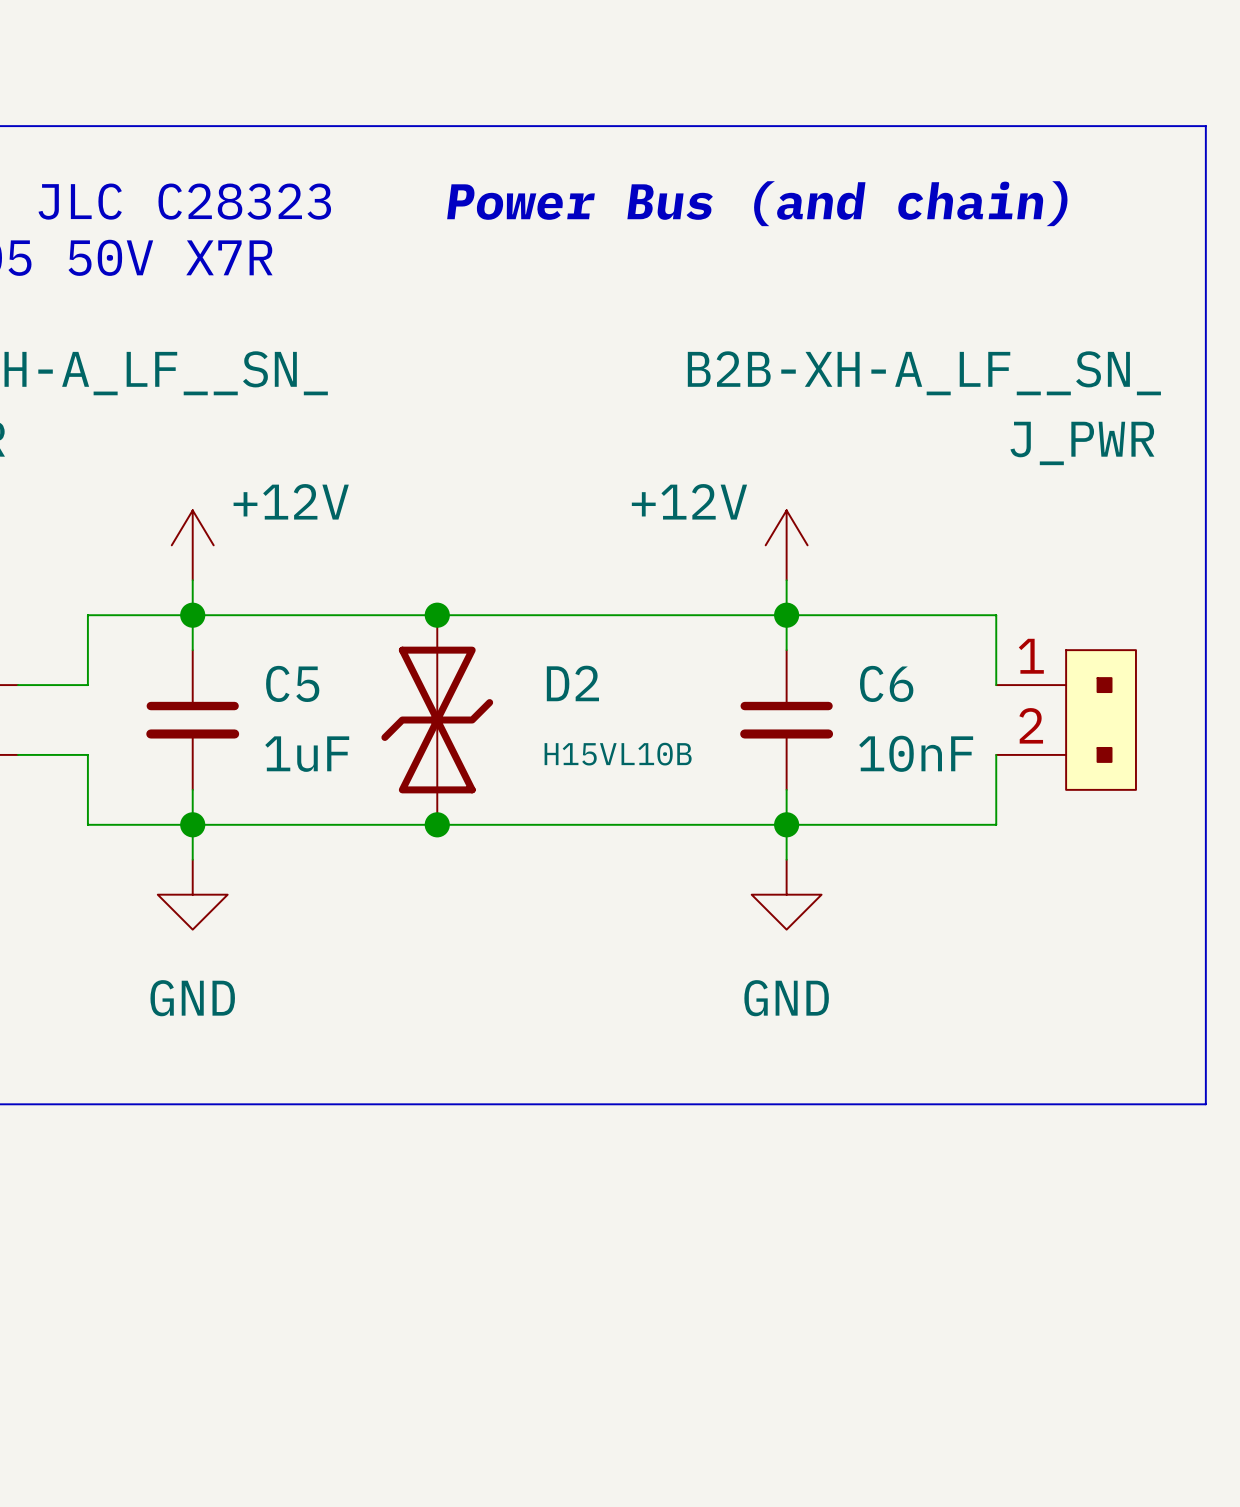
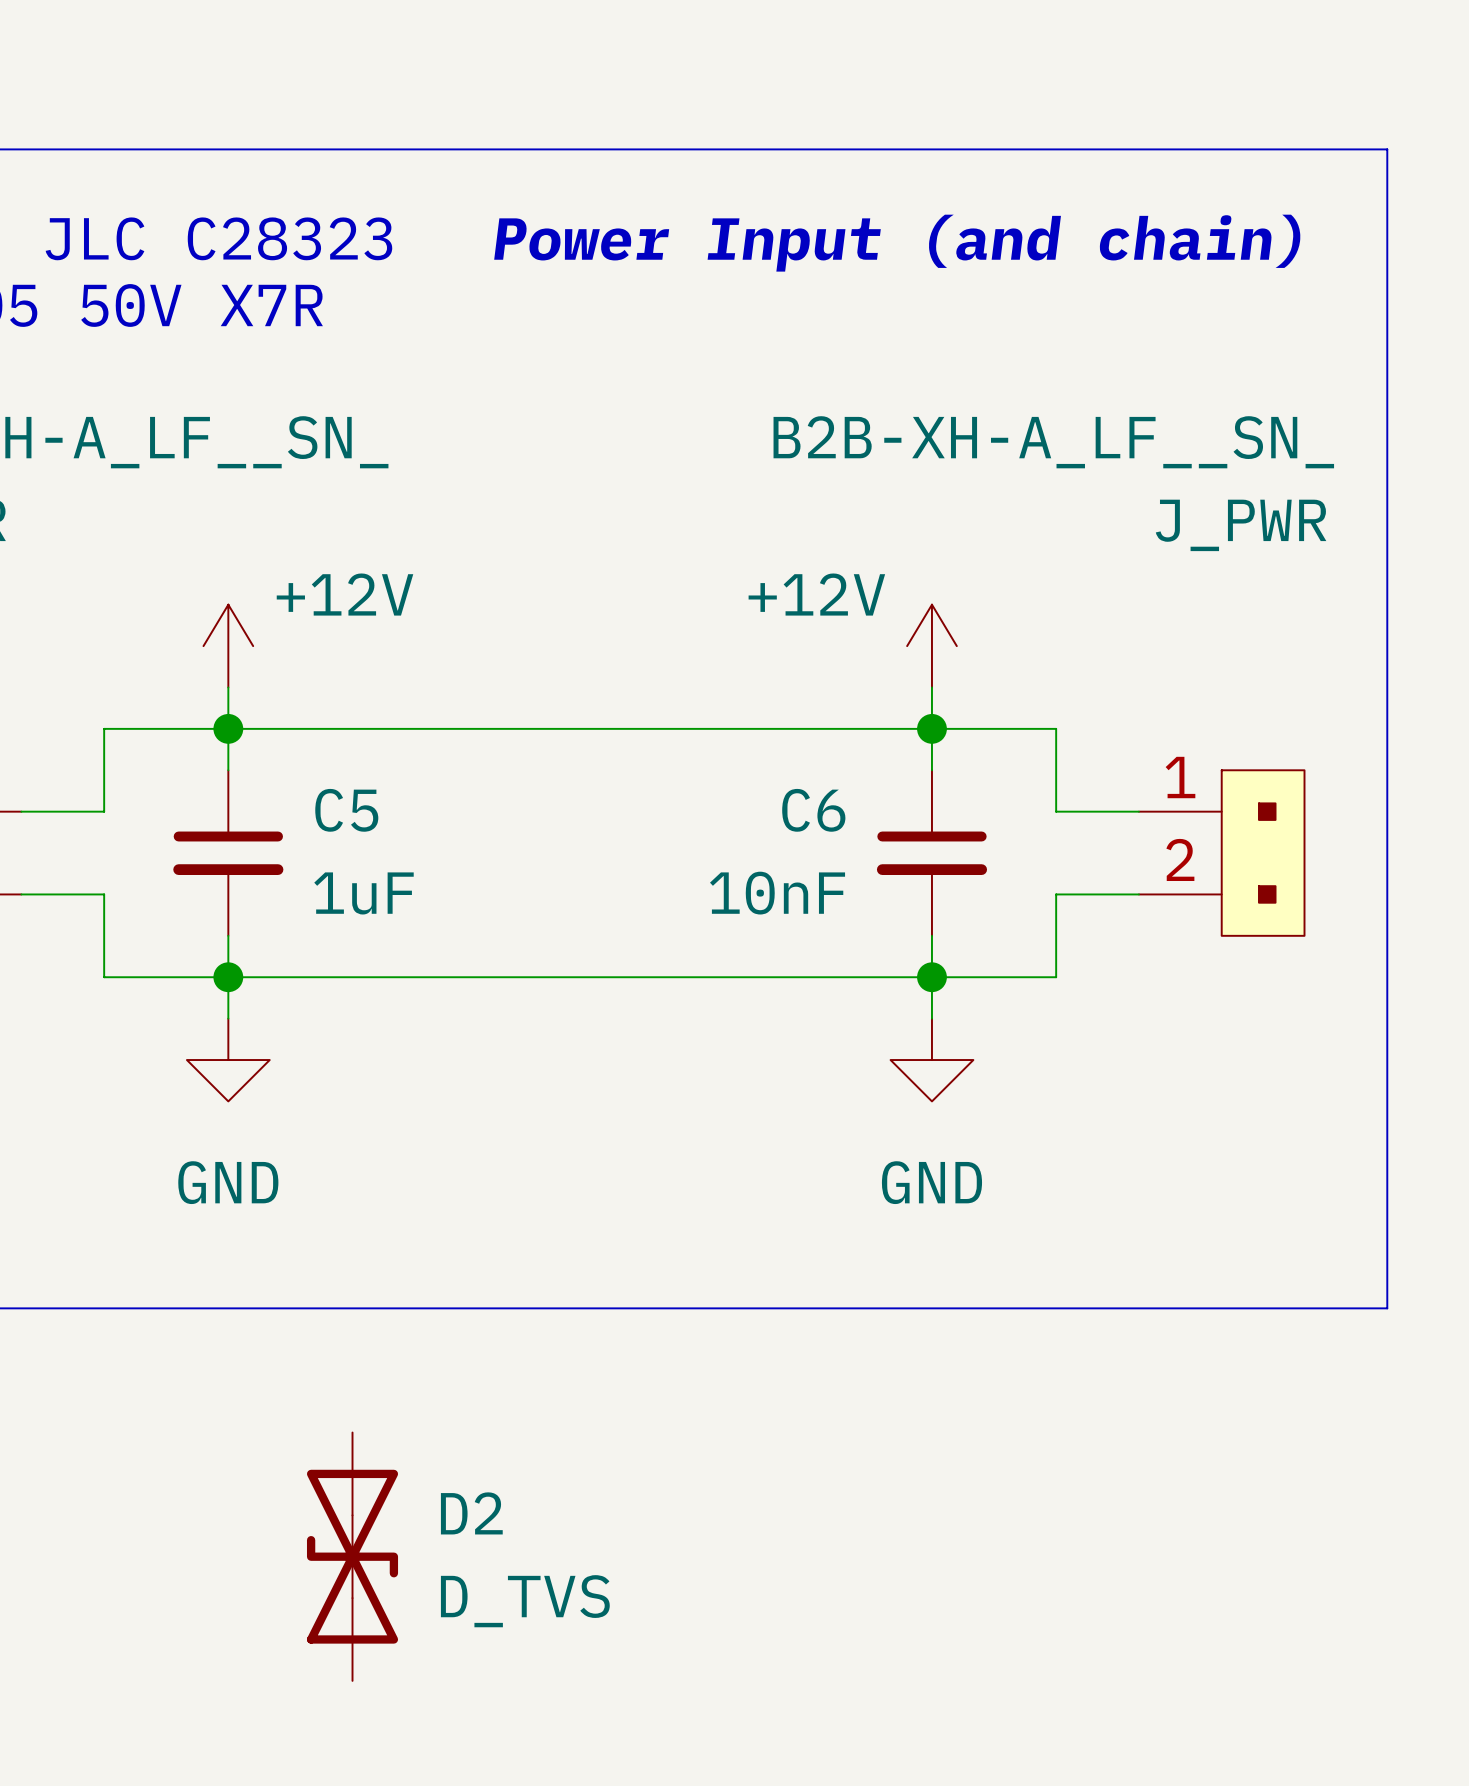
line: (1170, 126) (1205, 126) (1205, 1104) (1170, 1104) -> (1387, 149) (1387, 1308)
text: Power Bus (and chain) (757, 203) -> Power Input (and chain) (897, 243)
D2 symbol: [381, 615, 494, 825] -> [306, 1432, 399, 1681]
junction: (437, 615) -> none
wire: (891, 615) (996, 615) (996, 685) -> (1056, 728) (1056, 811) (1138, 811)
C6 name position: C6 (886, 683) -> C6 (813, 810)
J_PWR position: (1066, 720) -> (1221, 853)
C6 value position: 10nF (916, 753) -> 10nF (777, 893)
D2 value: H15VL10B (618, 754) -> D_TVS (525, 1601)
wire: (996, 754) (996, 824) (891, 824) -> (1138, 894) (1056, 894) (1056, 977)
junction: (437, 824) -> none

